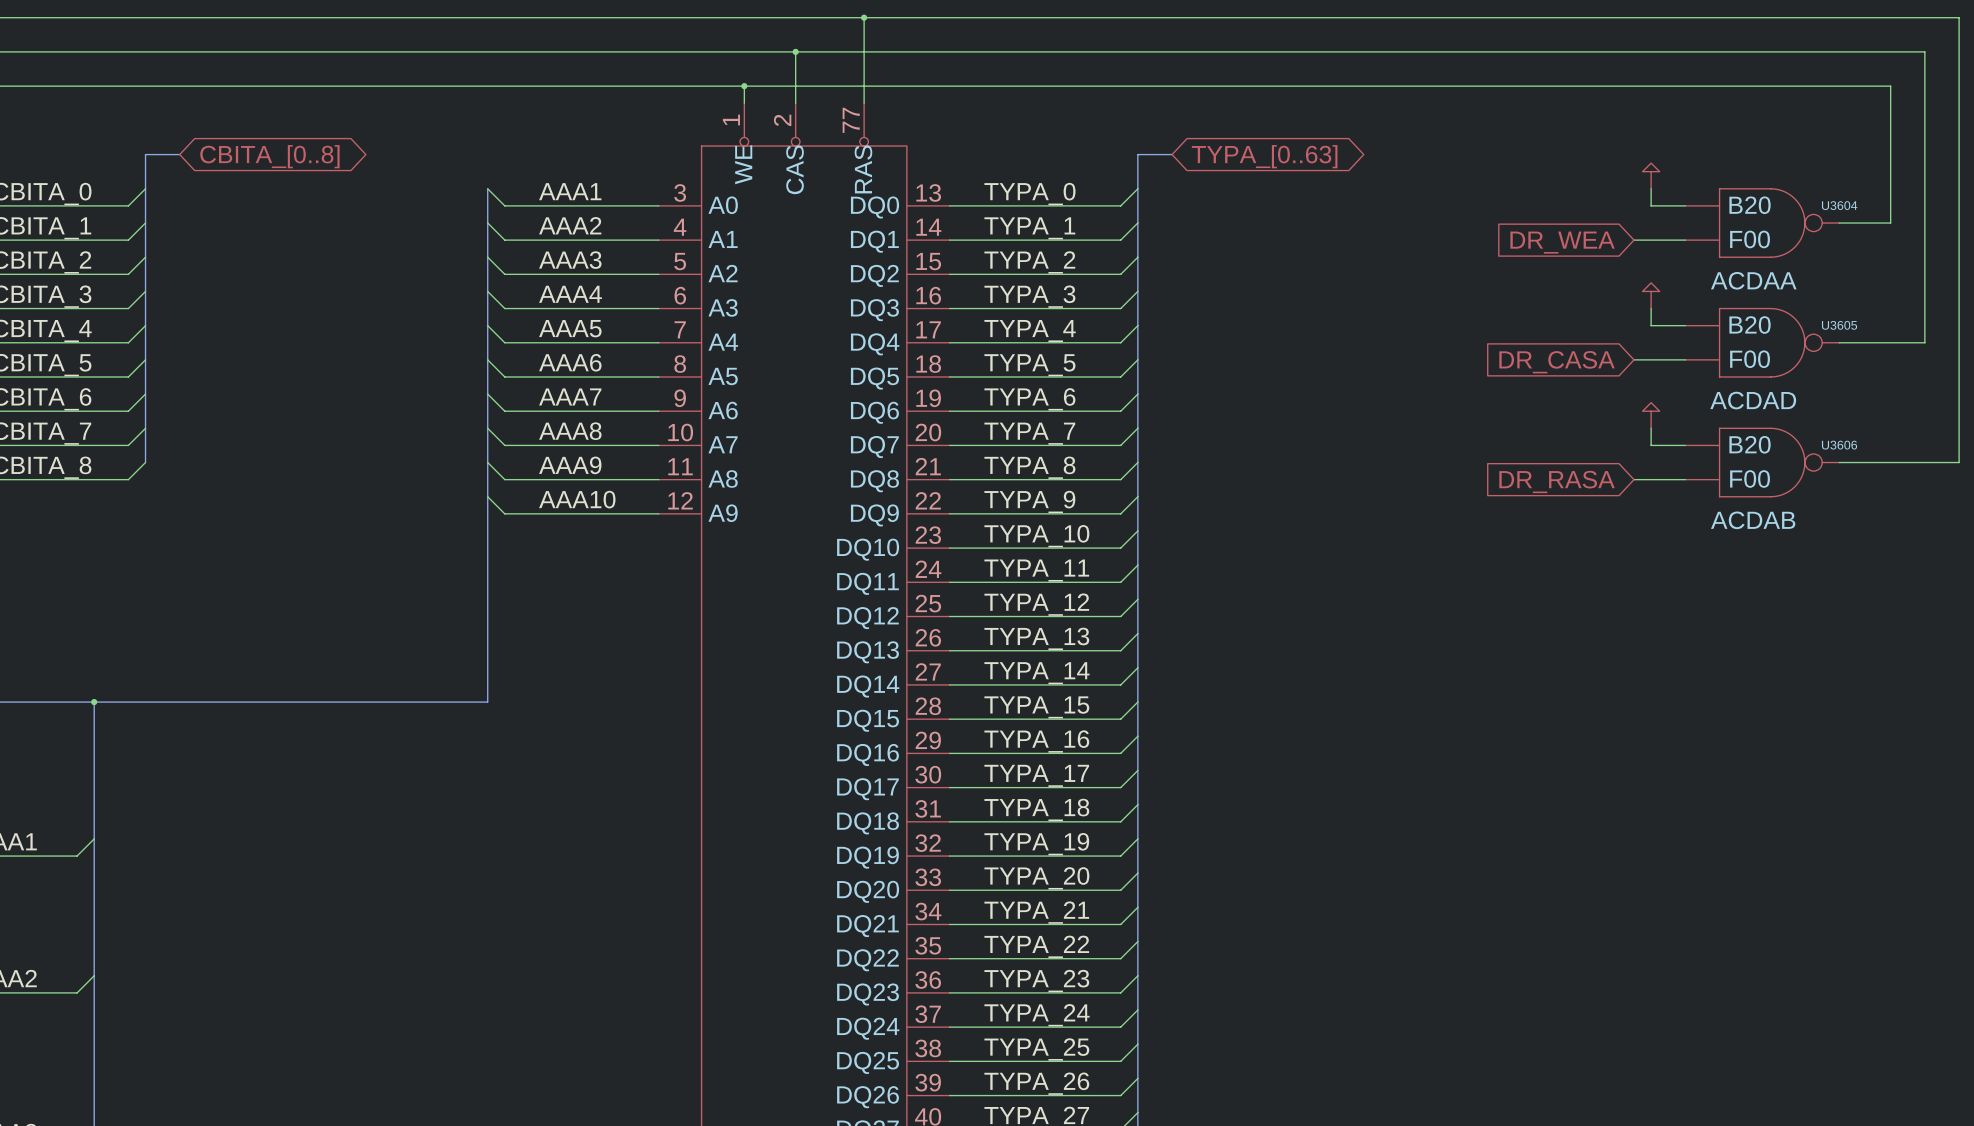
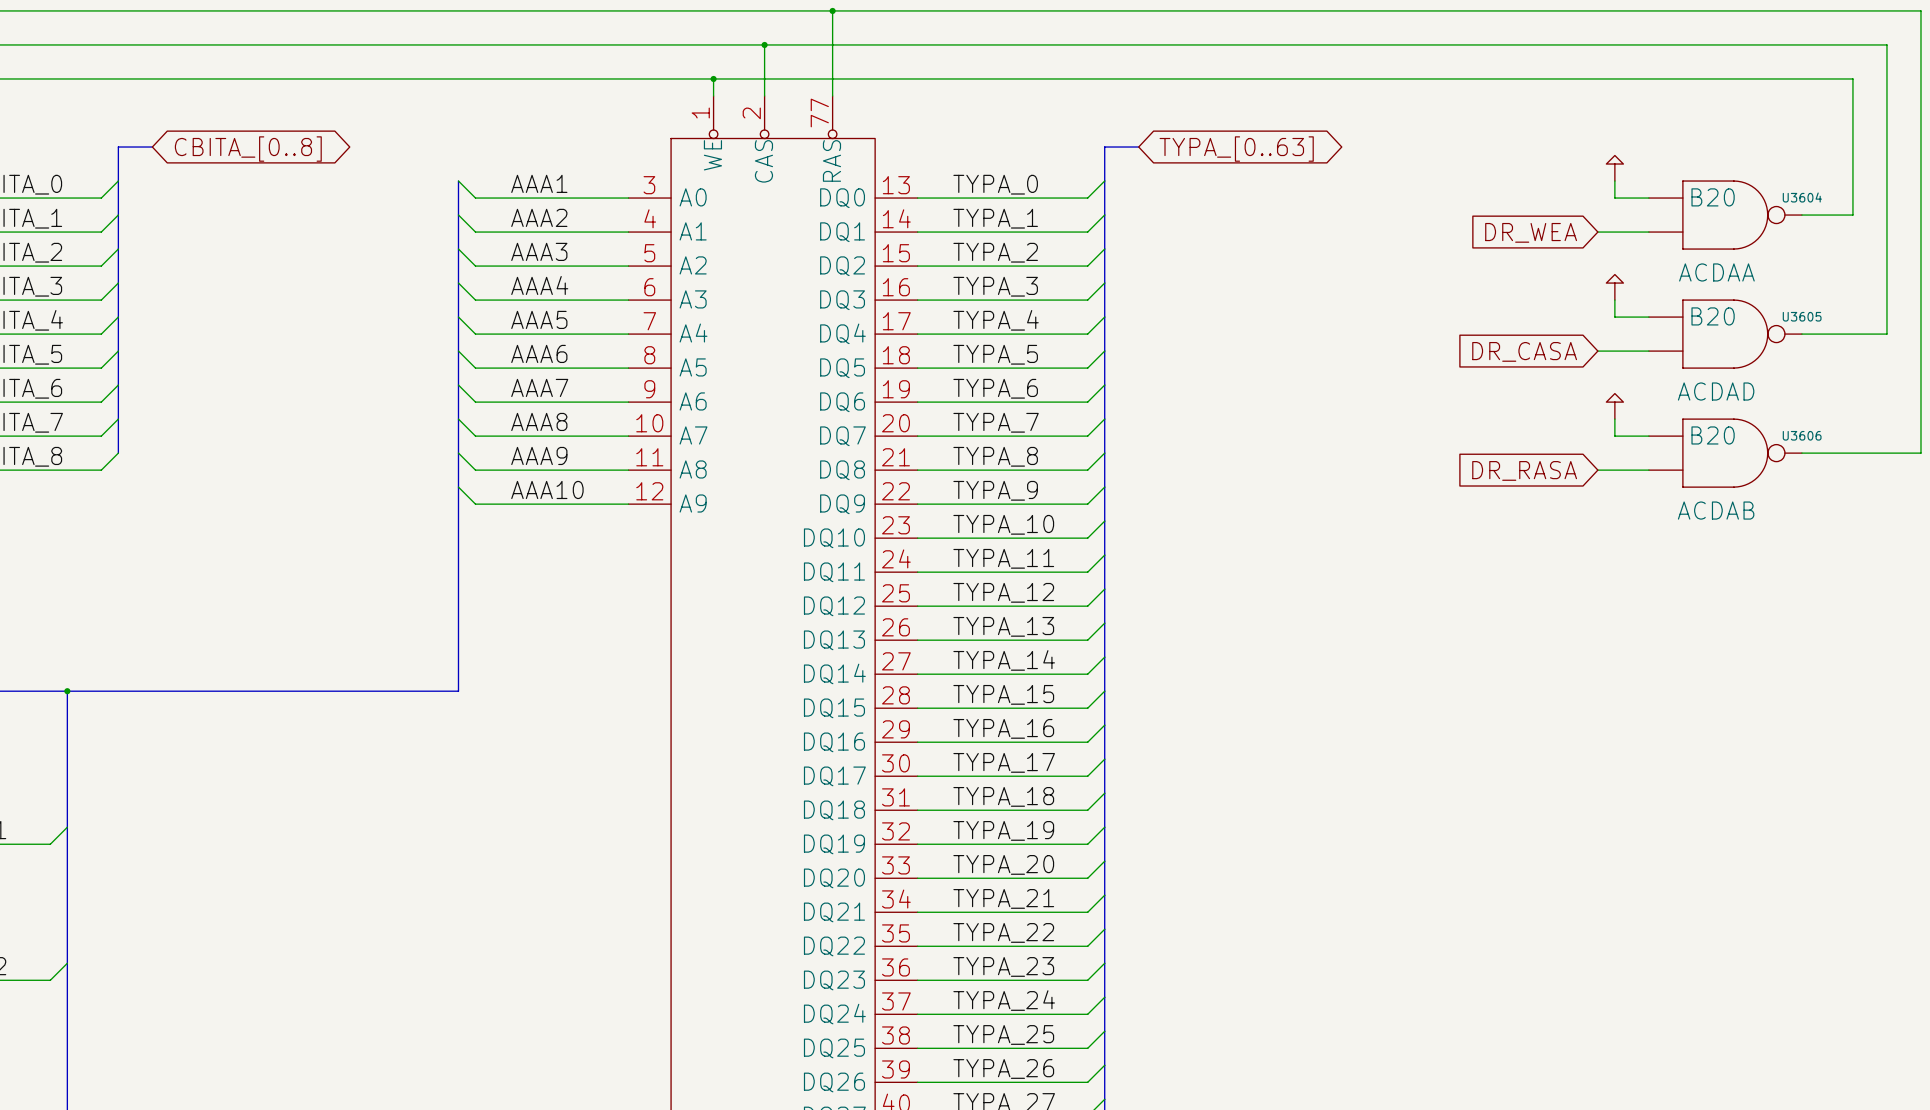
U3604 value: F00 (1750, 239) -> none
U3605 value: F00 (1750, 359) -> none
U3606 value: F00 (1750, 479) -> none

